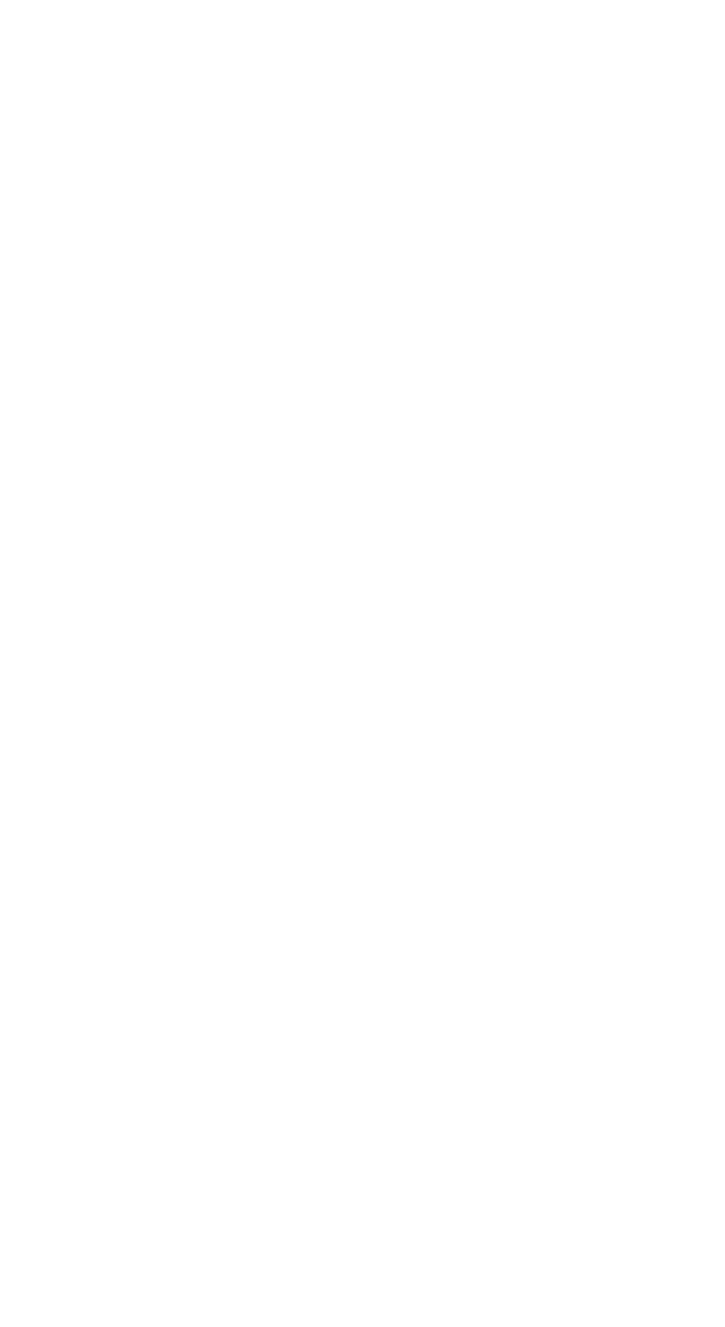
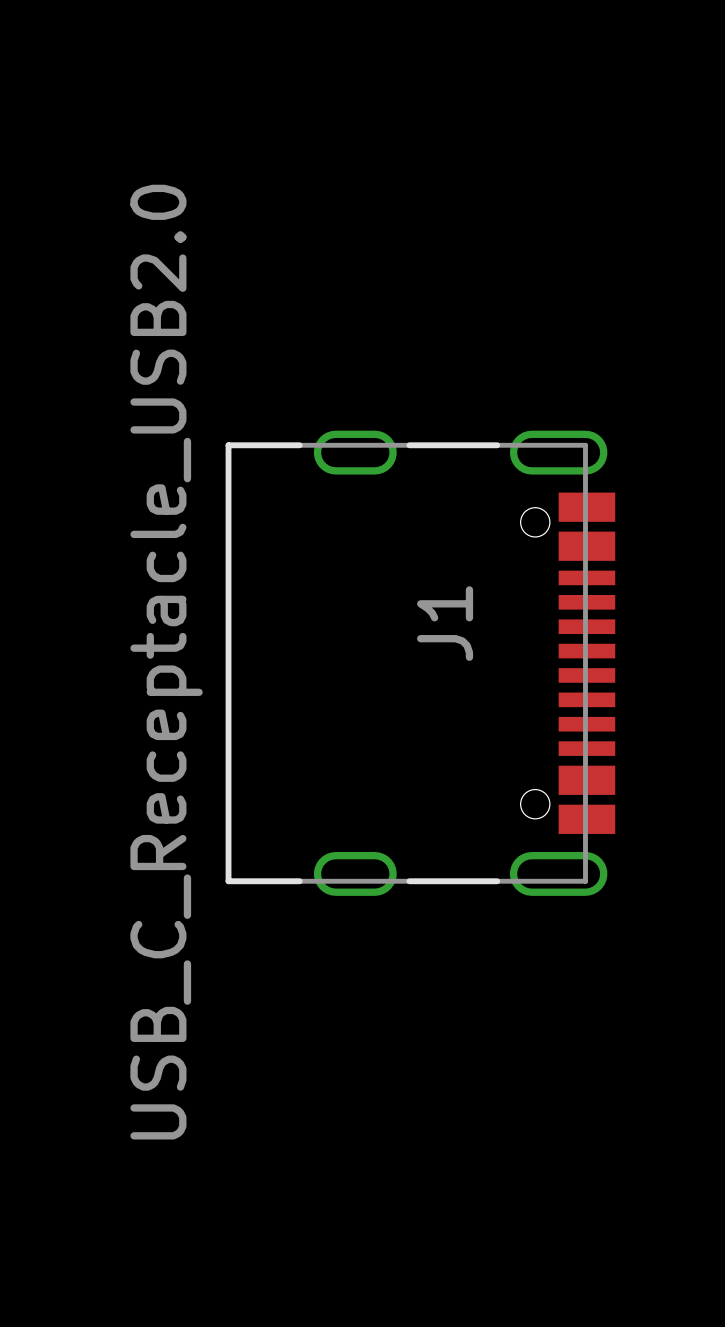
J1: none -> USB_C_Receptacle_USB2.0 (420, 663)

